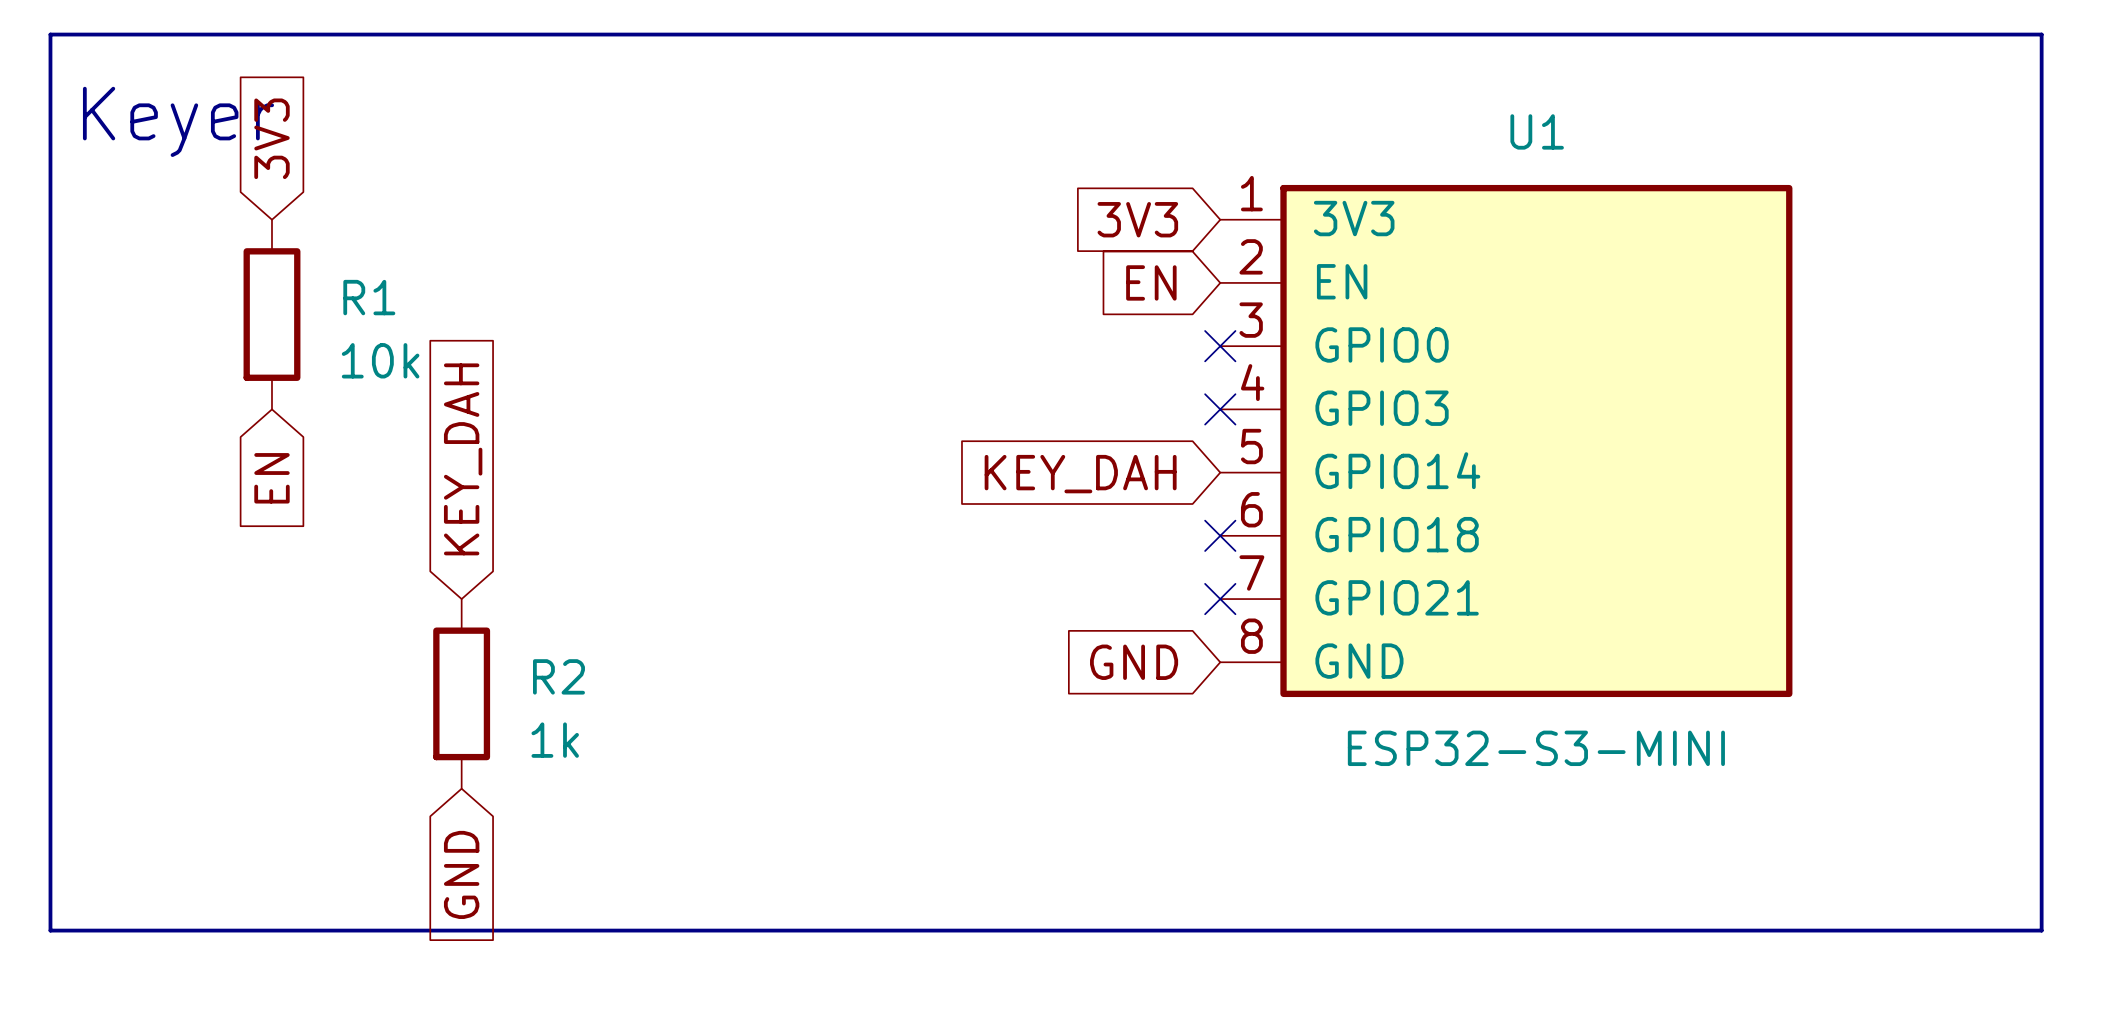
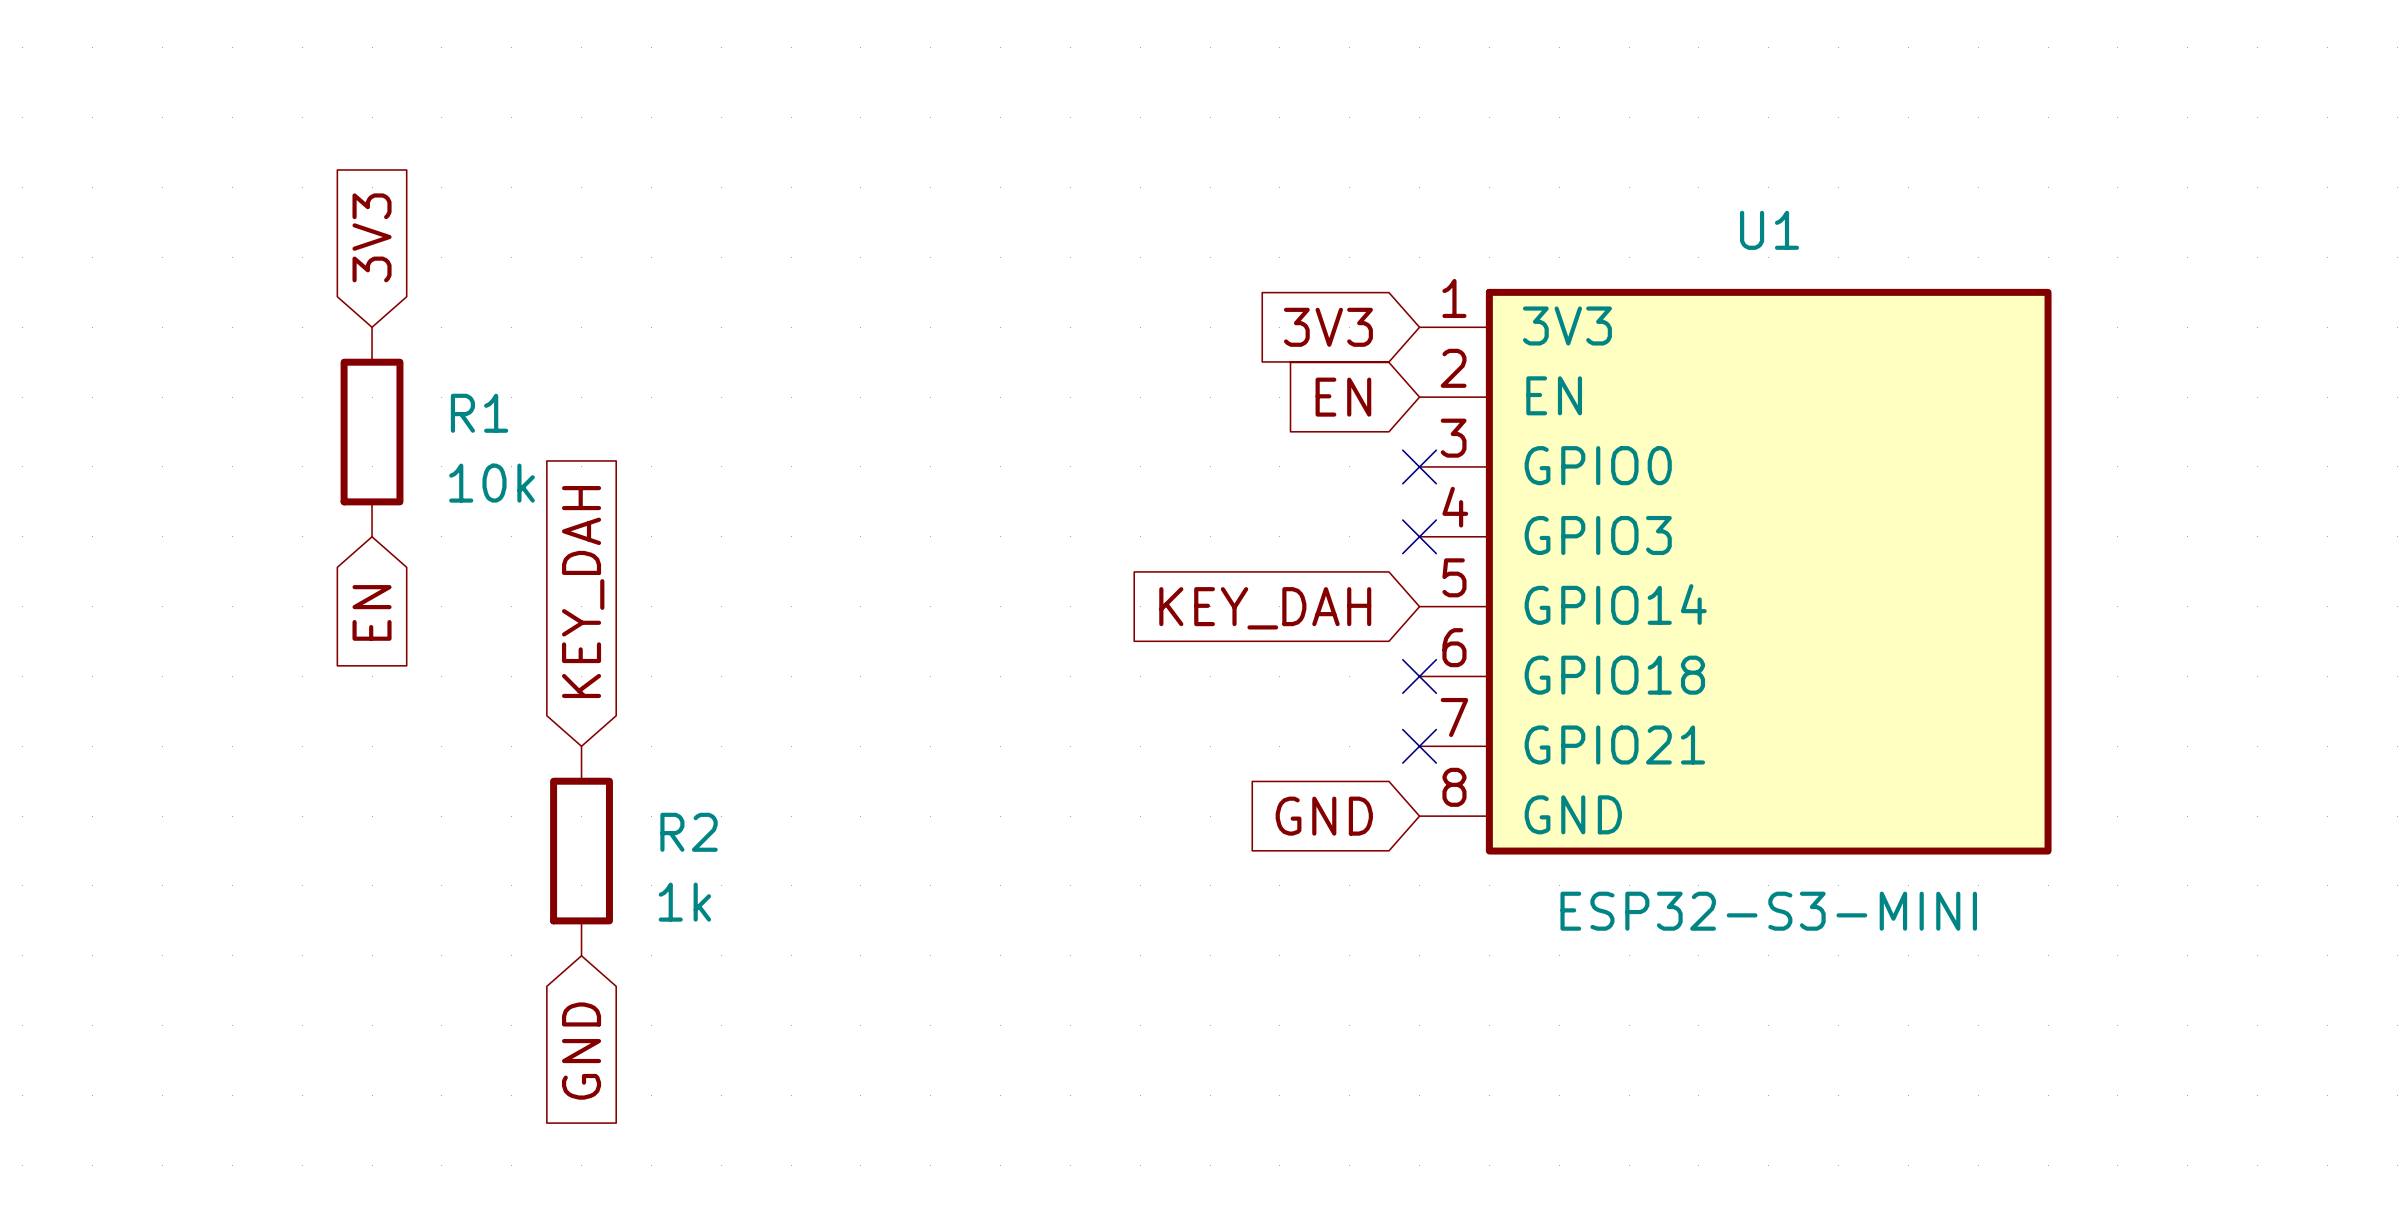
line: (50, 34) (2041, 34) (2041, 930) (50, 930) (50, 34) -> none
text: Keyer (178, 121) -> none

